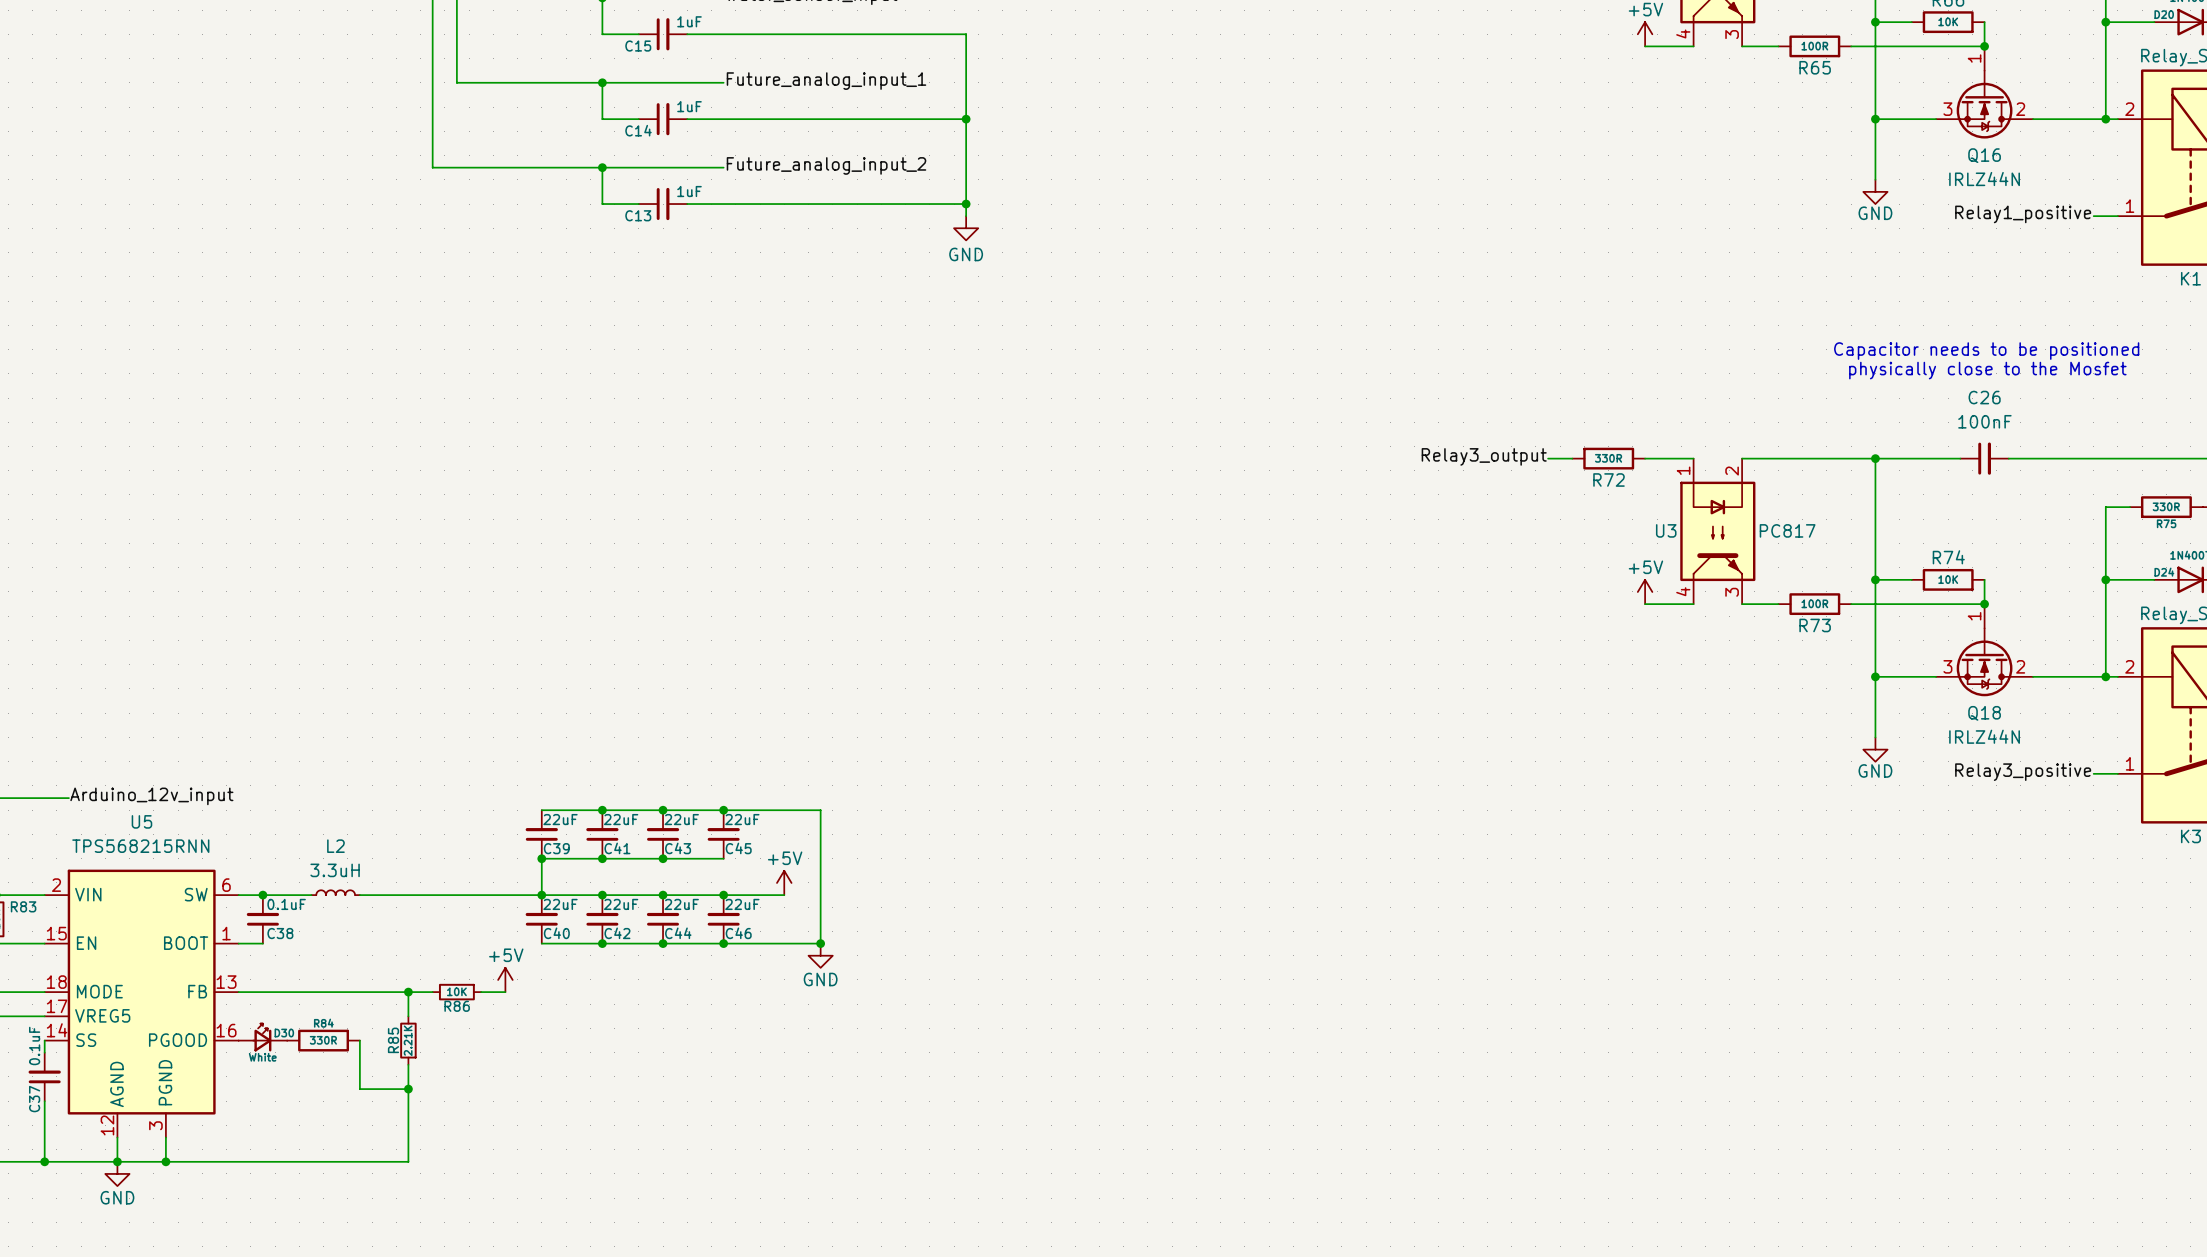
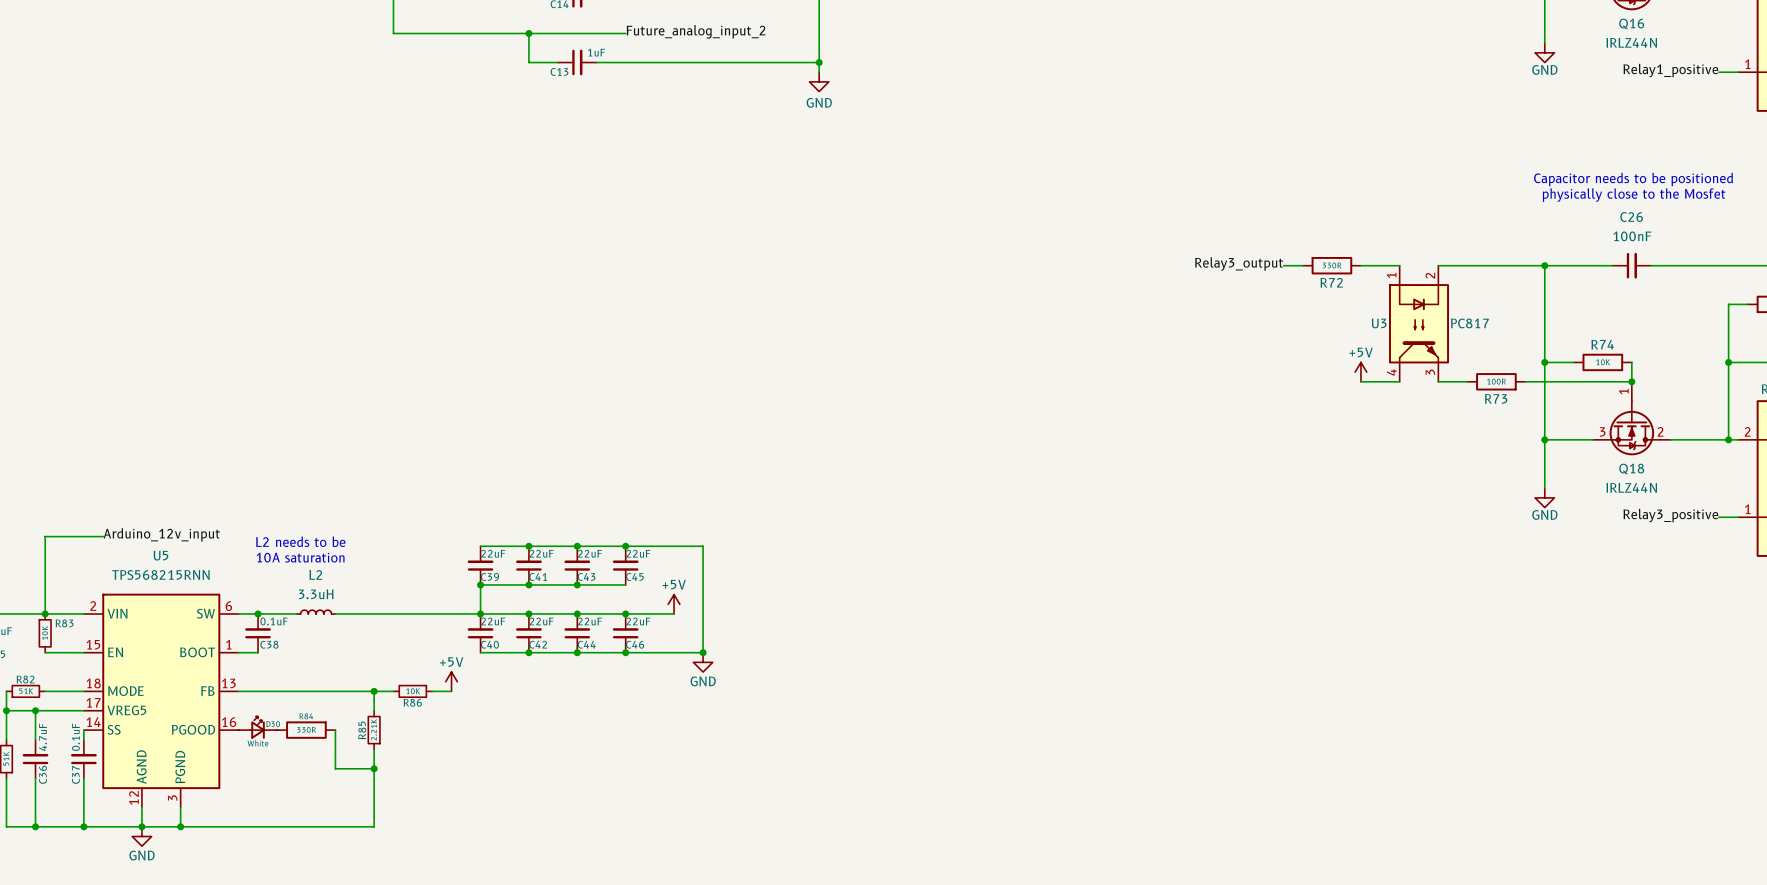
text: none -> L2 needs to be (300, 541)
text: none -> 10A saturation (300, 557)

